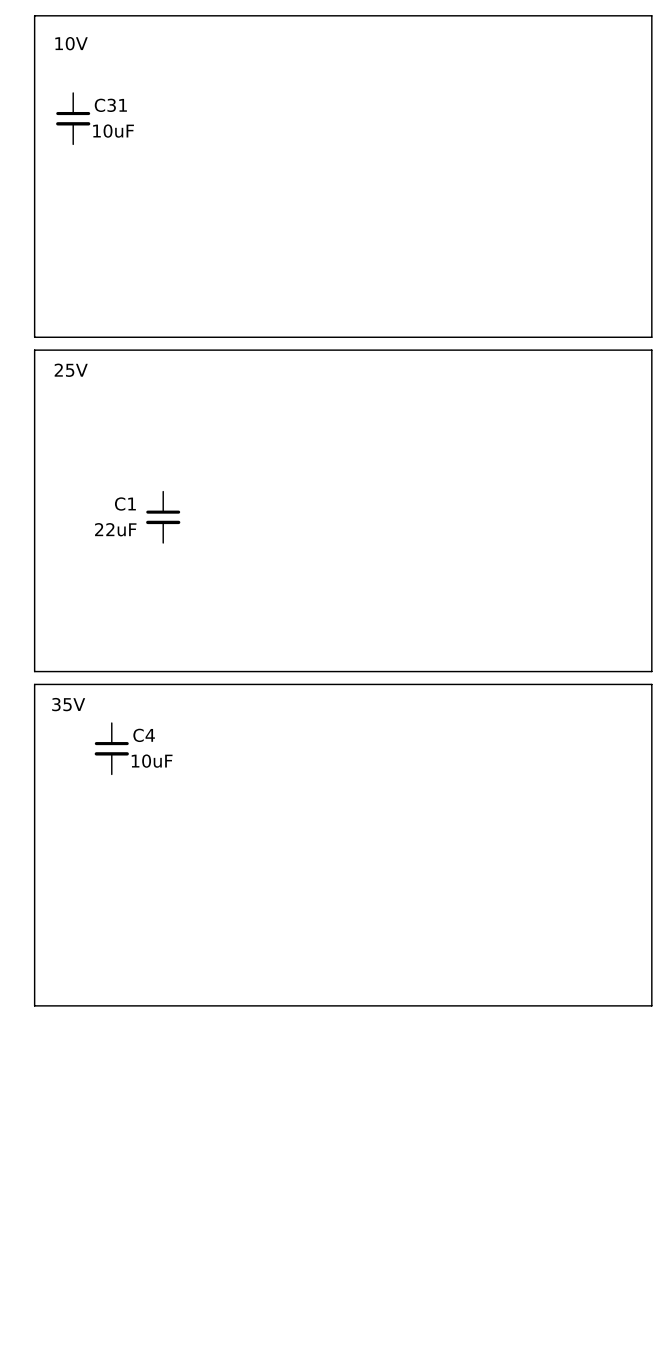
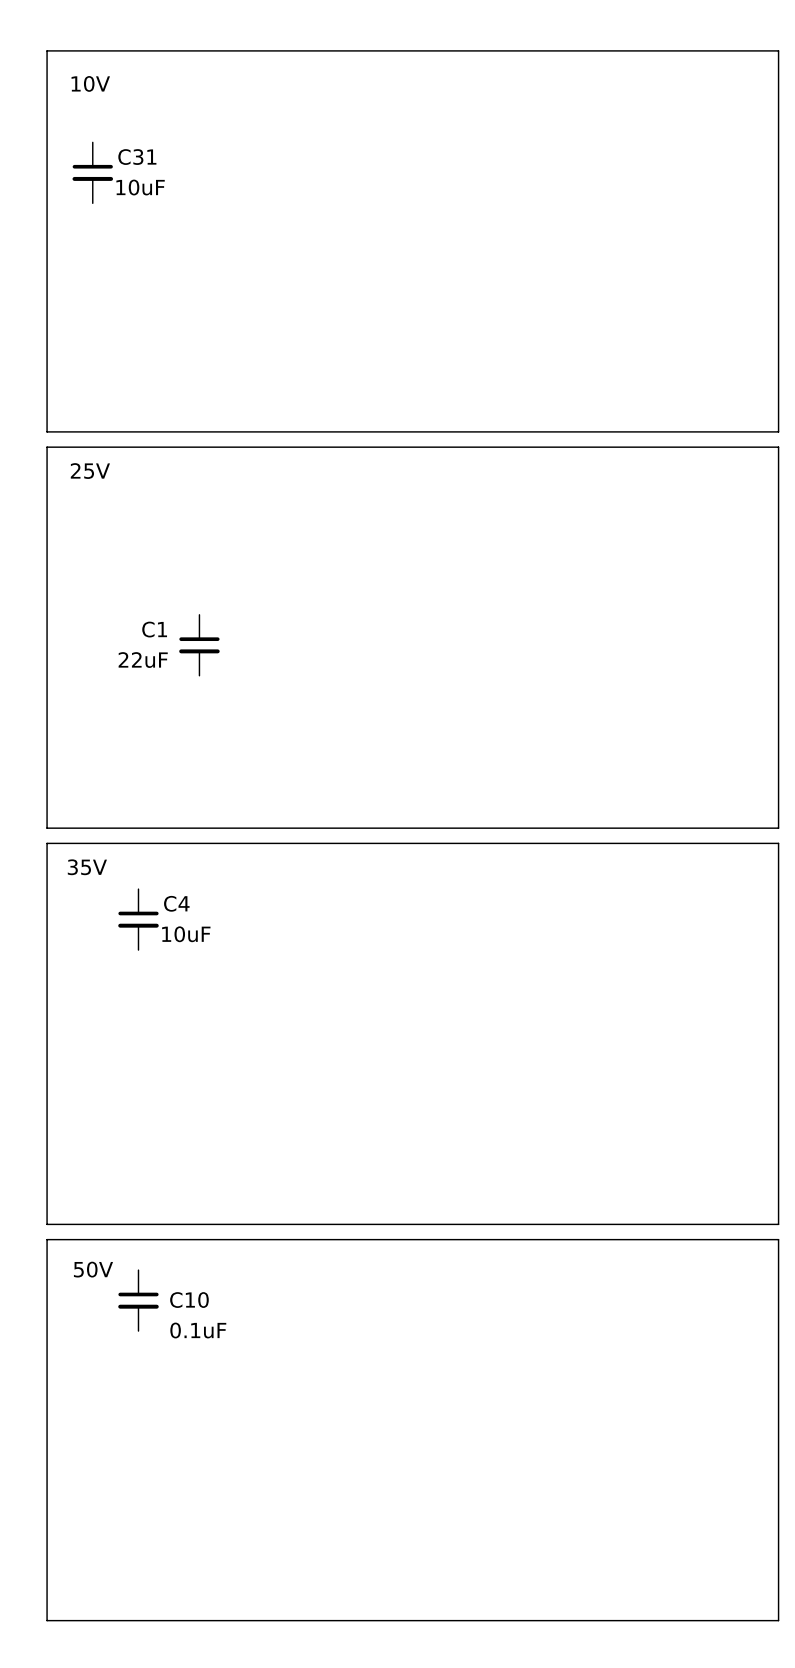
line: none -> (47, 1239) (778, 1239) (778, 1620) (47, 1620) (47, 1239)
text: none -> 50V (93, 1269)
C10: none -> 0.1uF (138, 1300)

